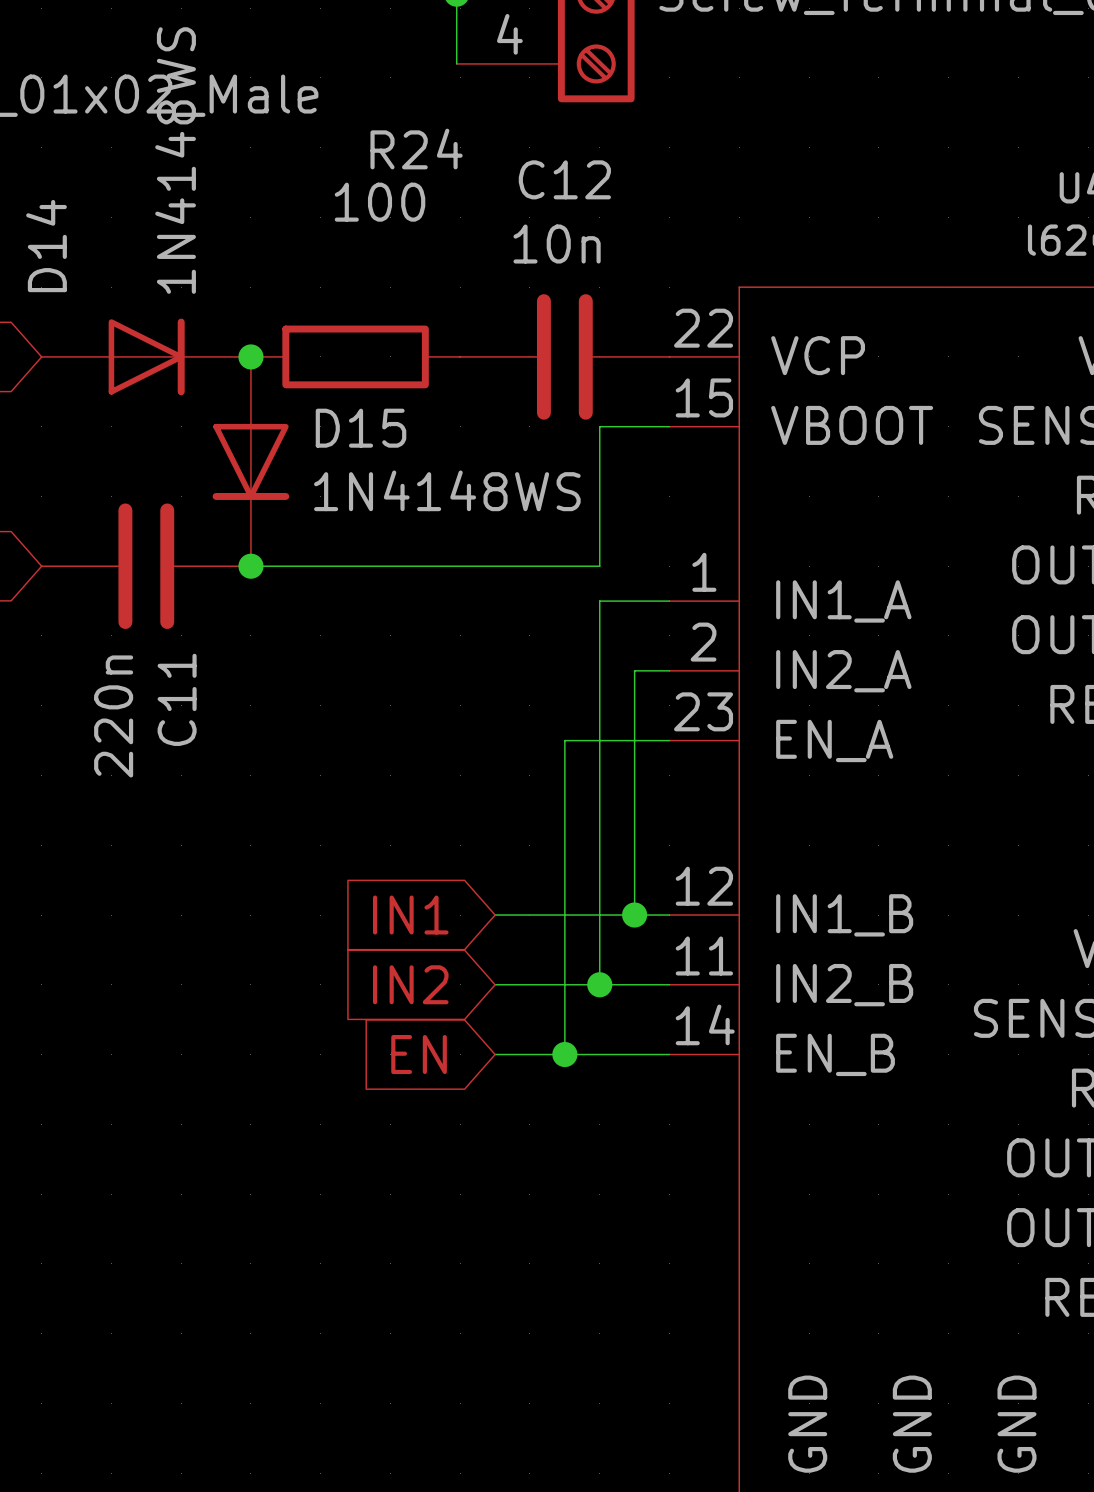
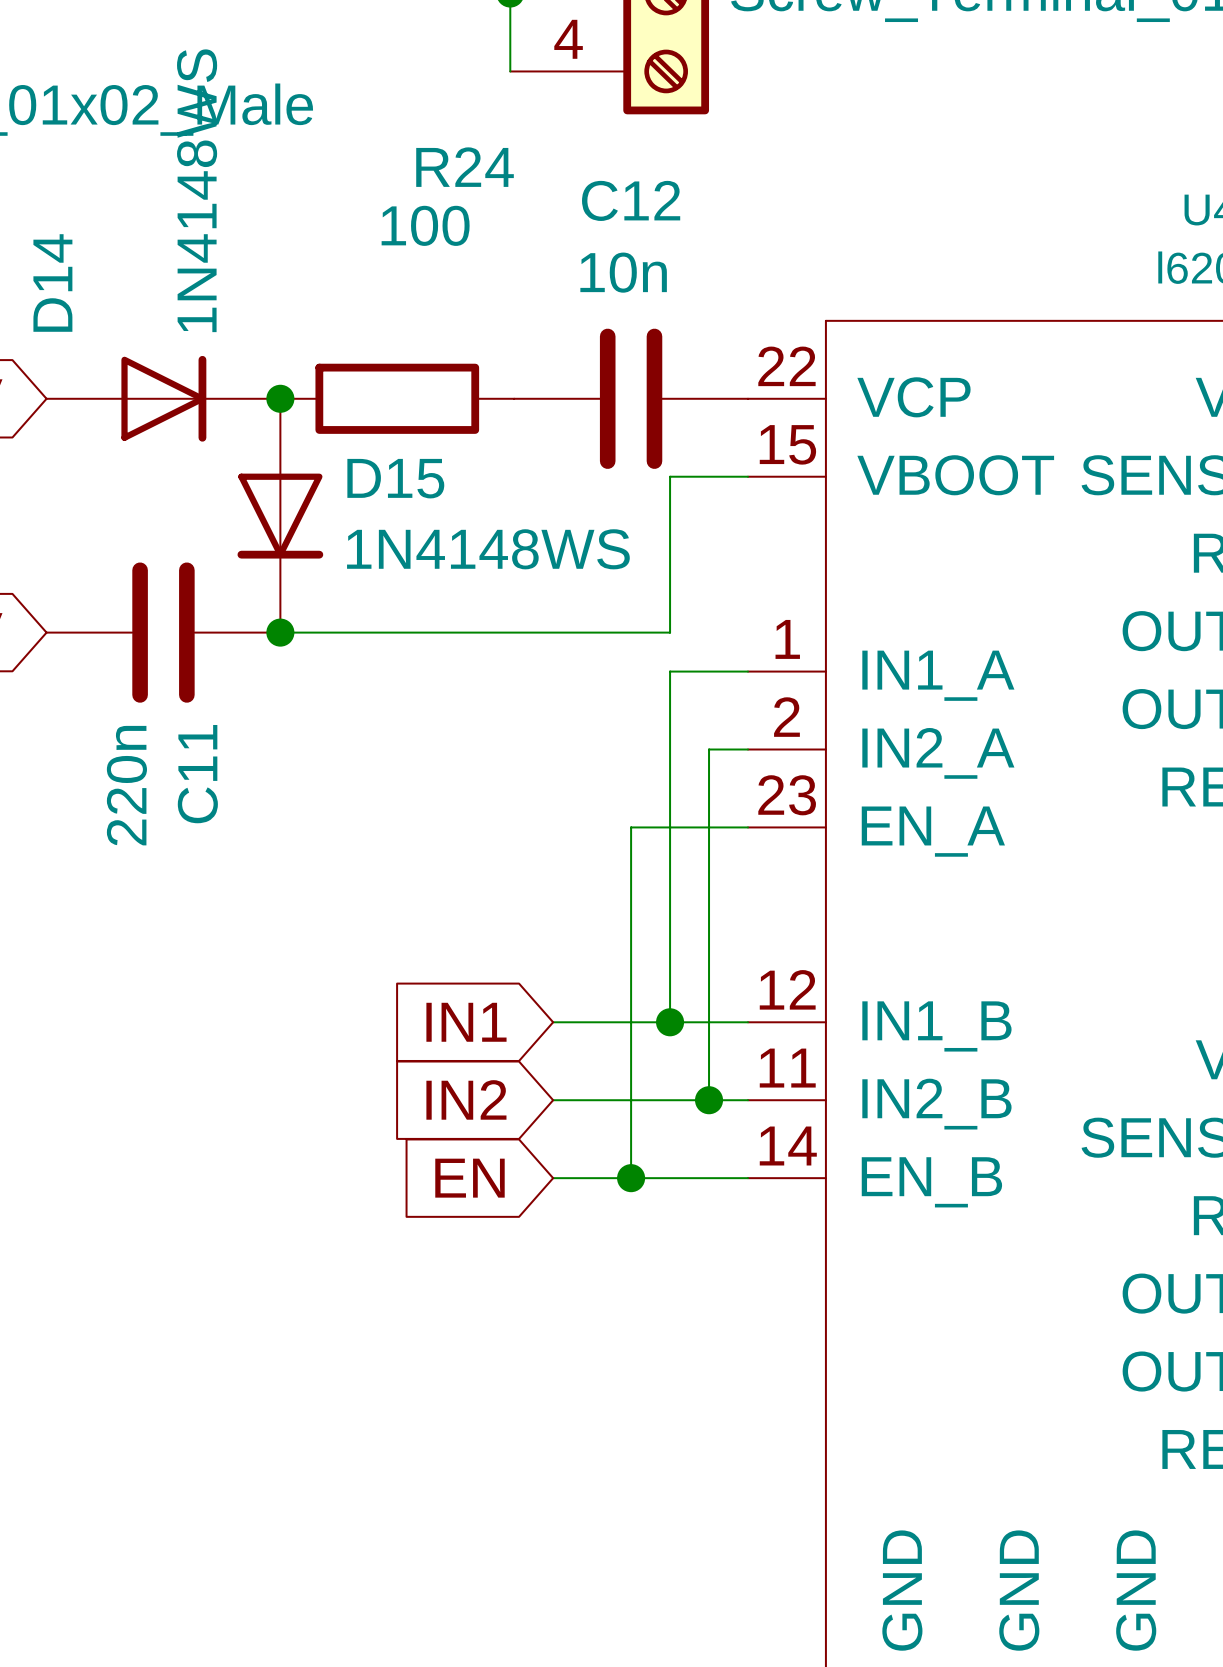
wire: (599, 915) (599, 984) -> (709, 1022) (709, 1100)
junction: none -> (670, 1022)
junction: (634, 915) -> none
junction: (599, 984) -> none
junction: none -> (709, 1100)

